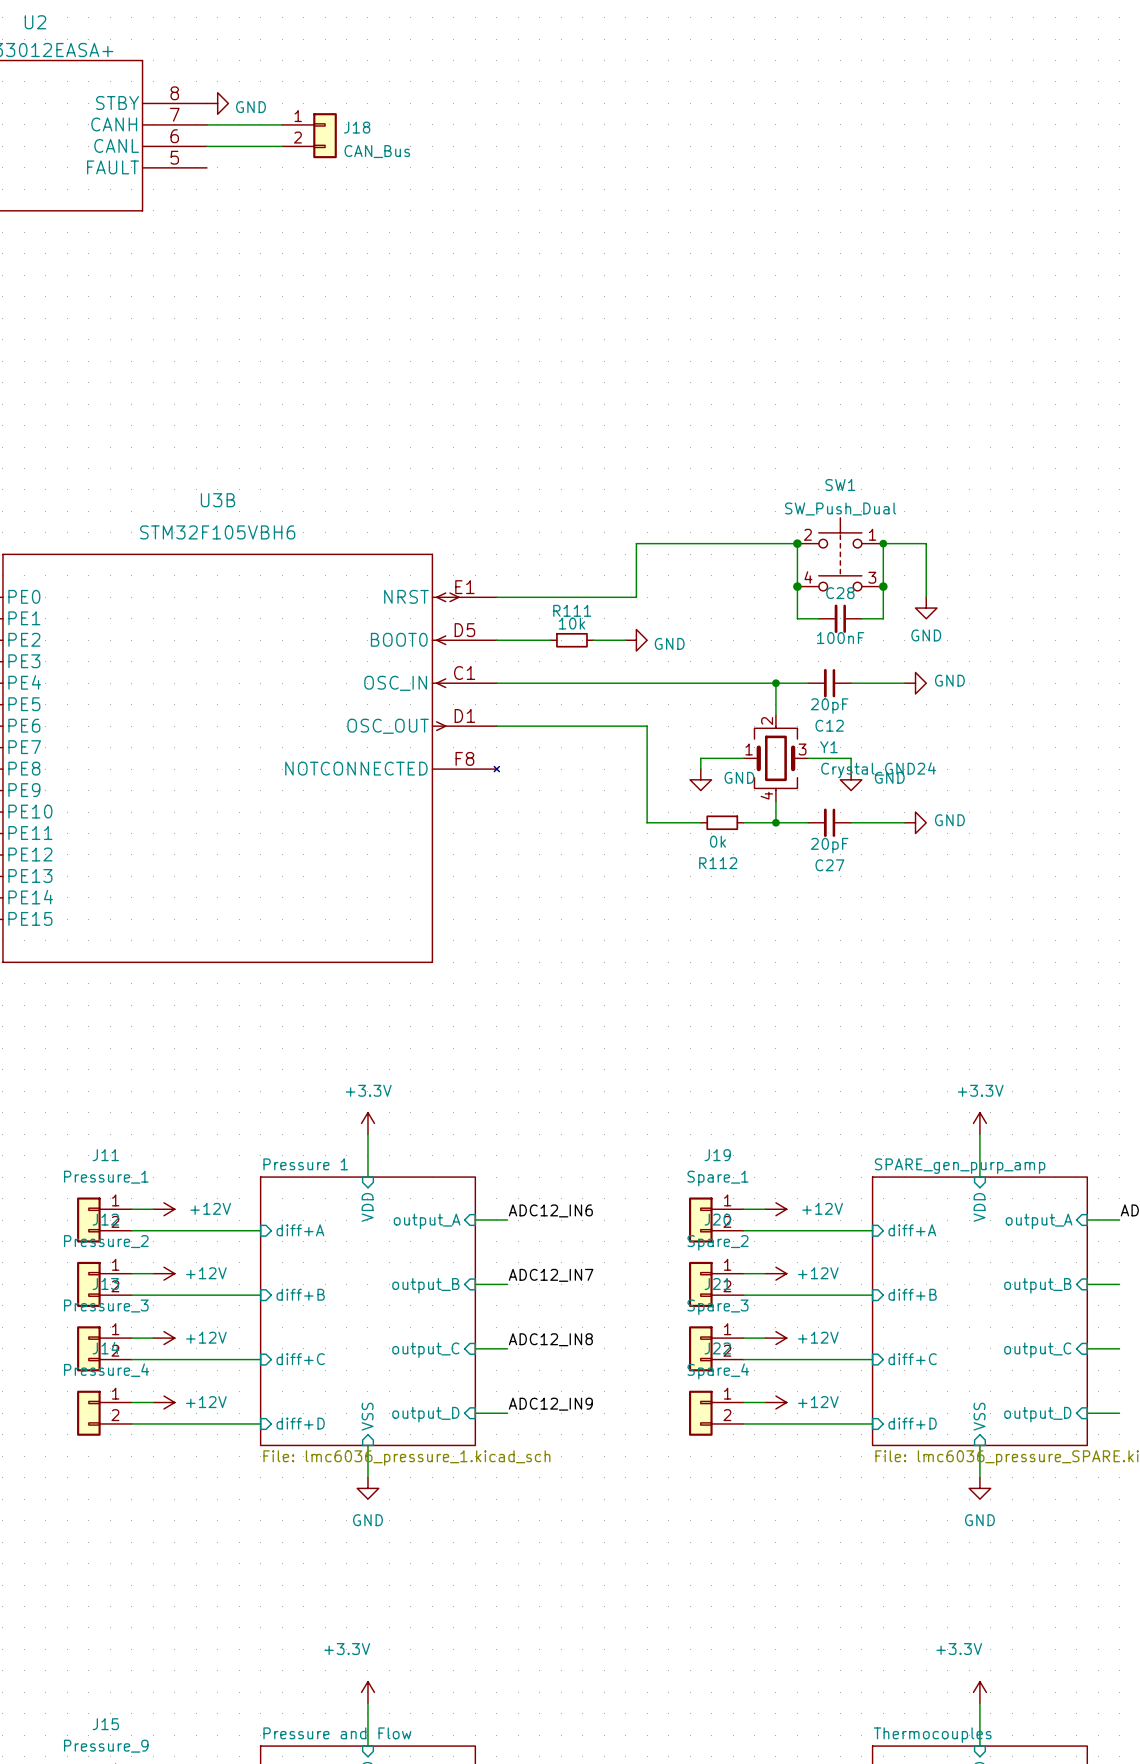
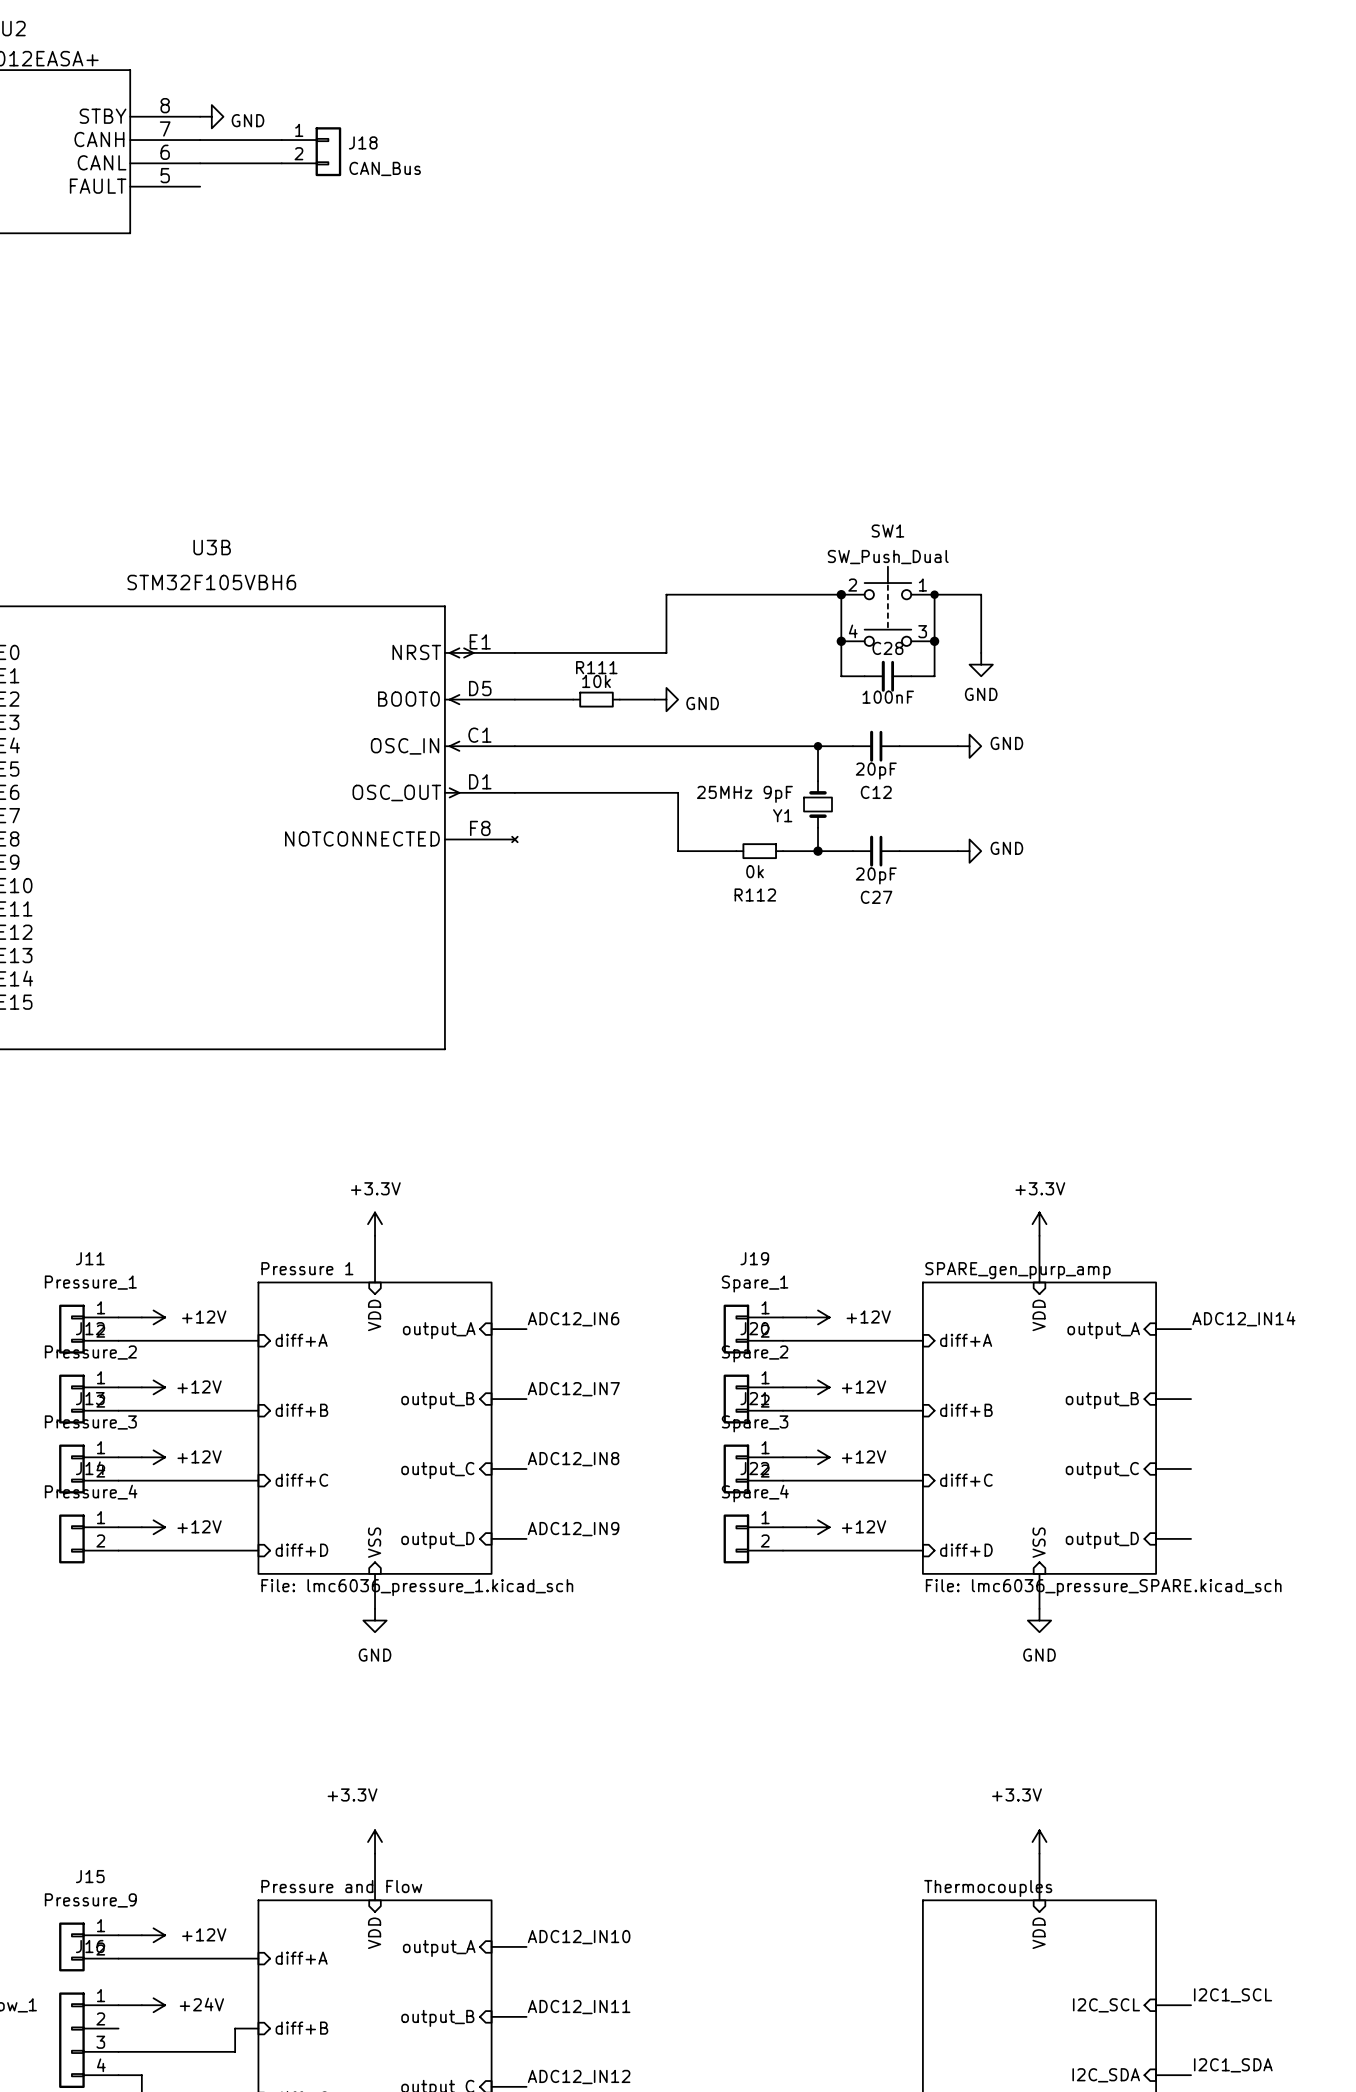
Y1 symbol: [743, 715, 809, 802] -> [804, 781, 832, 828]
Y1 name position: Y1 (828, 747) -> Y1 (782, 815)
wire: (743, 758) (700, 758) (700, 769) -> none
wire: (808, 758) (851, 758) (851, 769) -> none
Y1 value: Crystal_GND24 (878, 770) -> 25MHz 9pF (744, 794)
wire: (647, 779) (647, 822) (700, 822) -> (678, 851) (736, 851)
power symbol: GND (700, 779) -> none
junction: none -> (818, 851)
power symbol: GND (851, 779) -> none
power symbol: none -> GND (969, 851)
wire: (775, 801) (775, 822) -> (818, 827) (818, 851)
R112 position: (722, 822) -> (759, 851)
wire: (743, 822) (808, 822) -> (783, 851) (852, 851)
junction: (775, 822) -> none
C27 position: (829, 822) -> (876, 851)
wire: (851, 822) (904, 822) -> (899, 851) (957, 851)
power symbol: GND (915, 822) -> none

